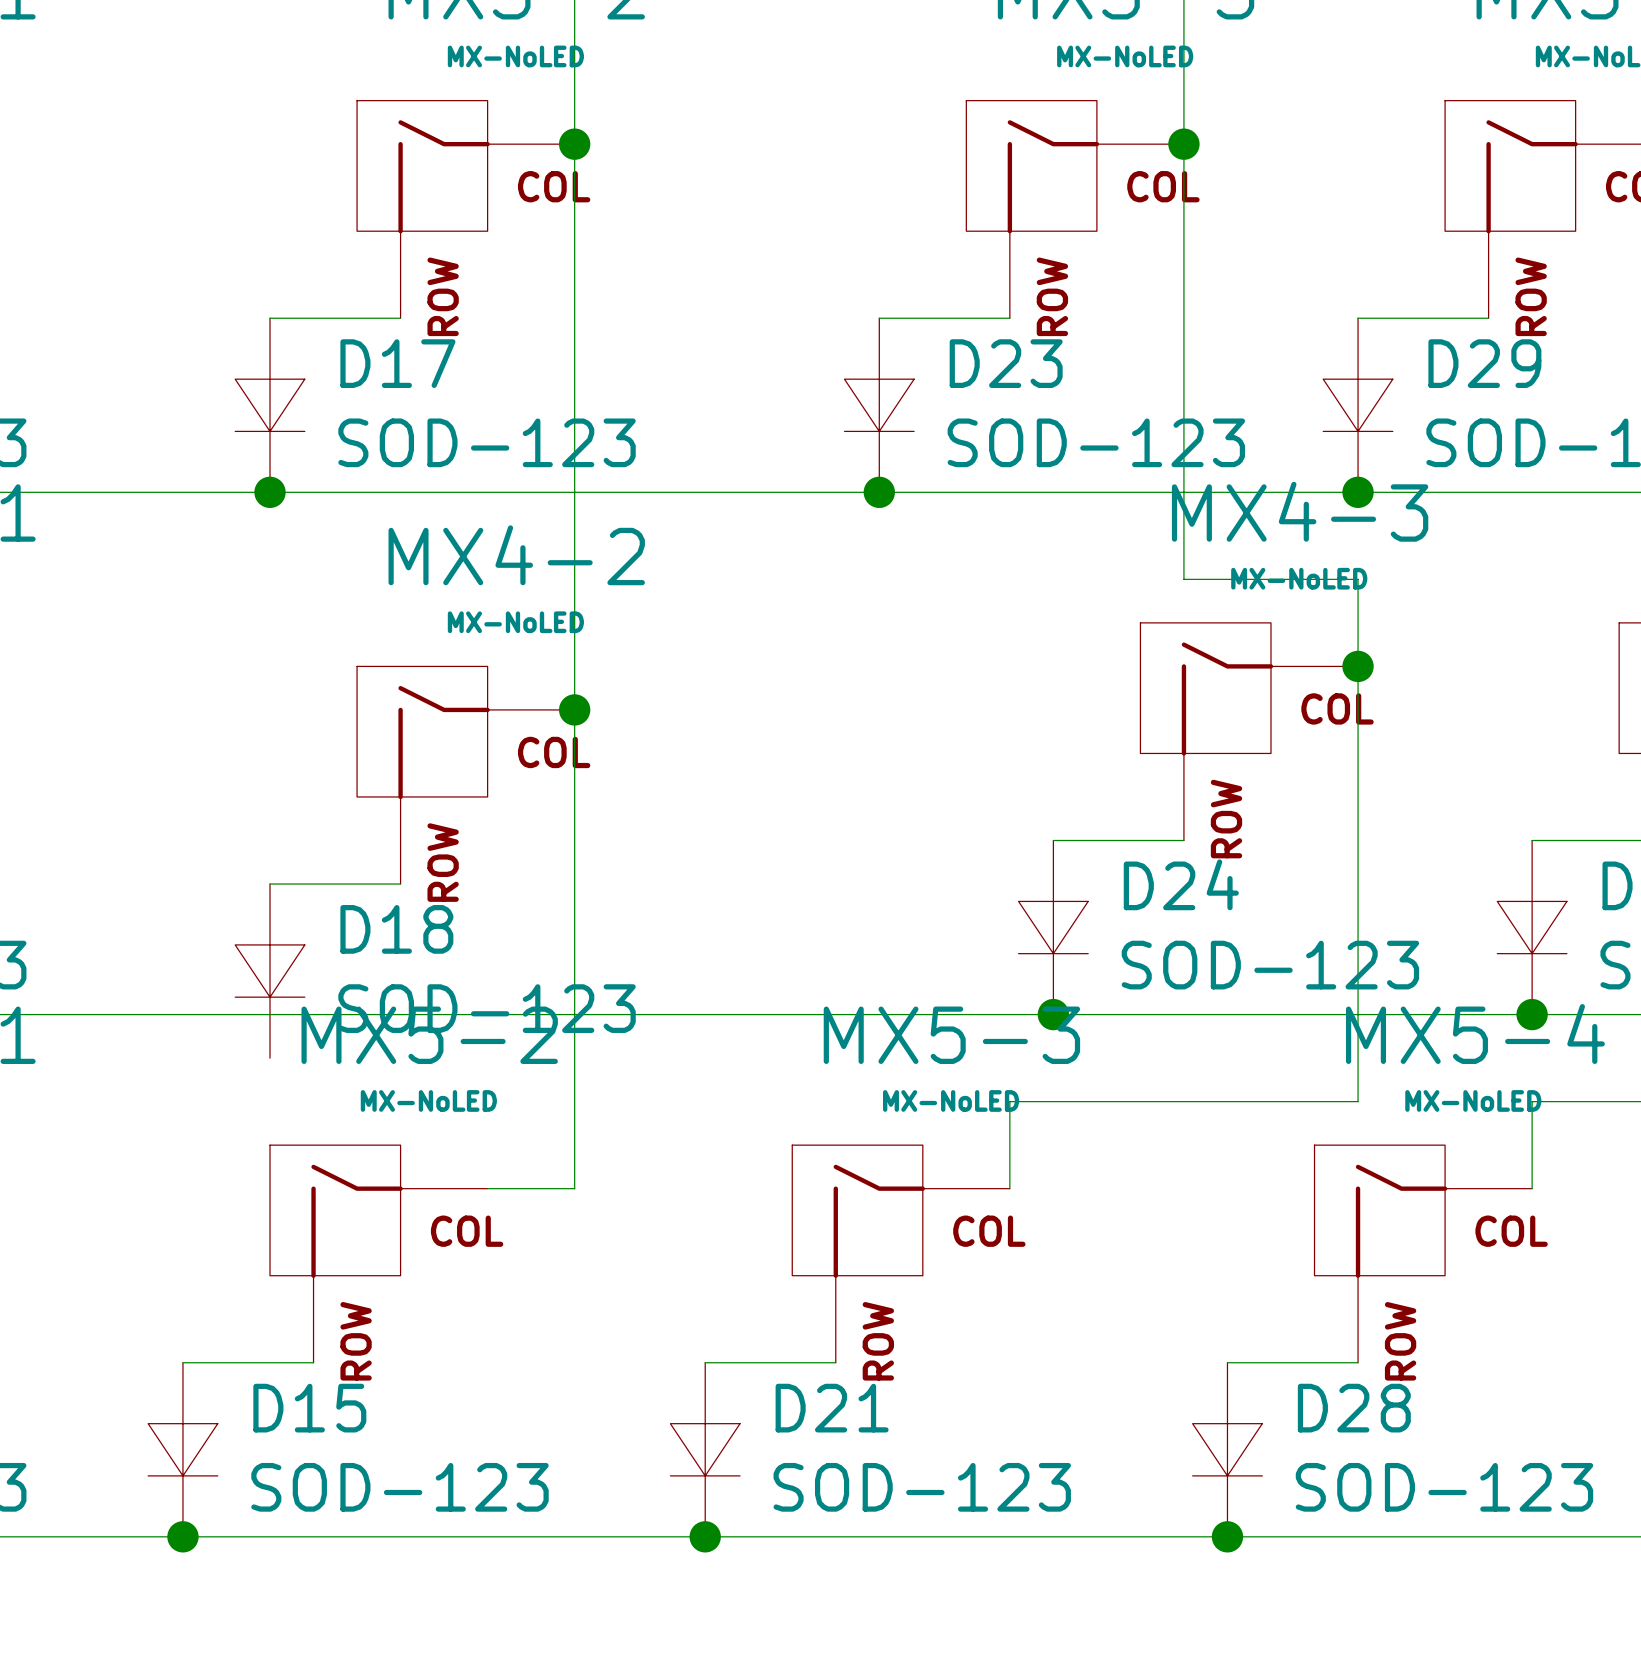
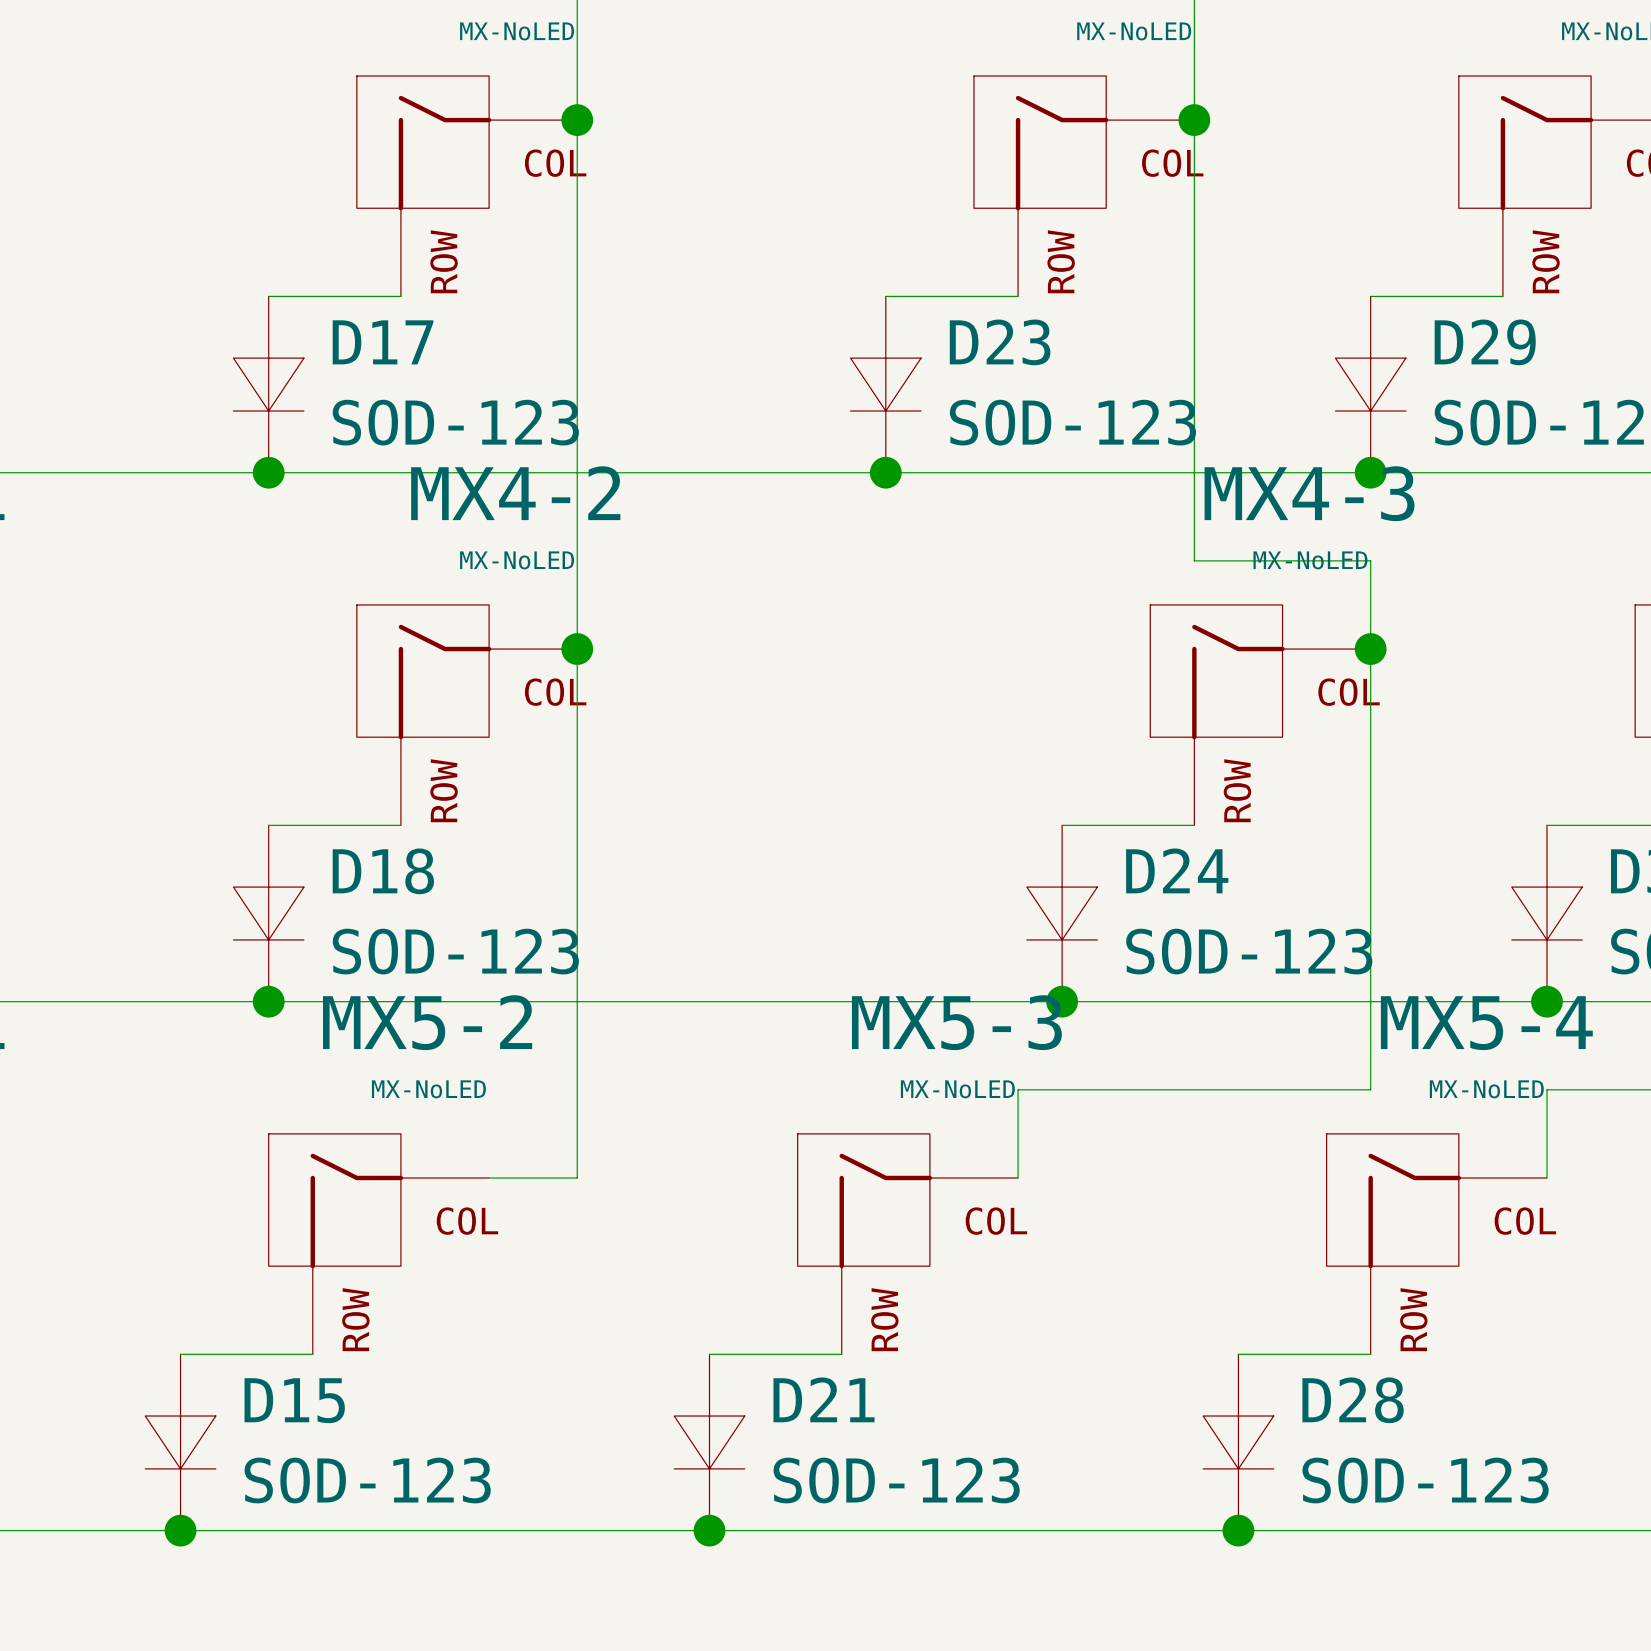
junction position: (574, 709) -> (577, 649)
MX4-2 position: (465, 775) -> (467, 715)
wire: (270, 884) (400, 884) -> (268, 825) (400, 825)
D18 position: (270, 971) -> (268, 913)
junction: none -> (268, 1001)

